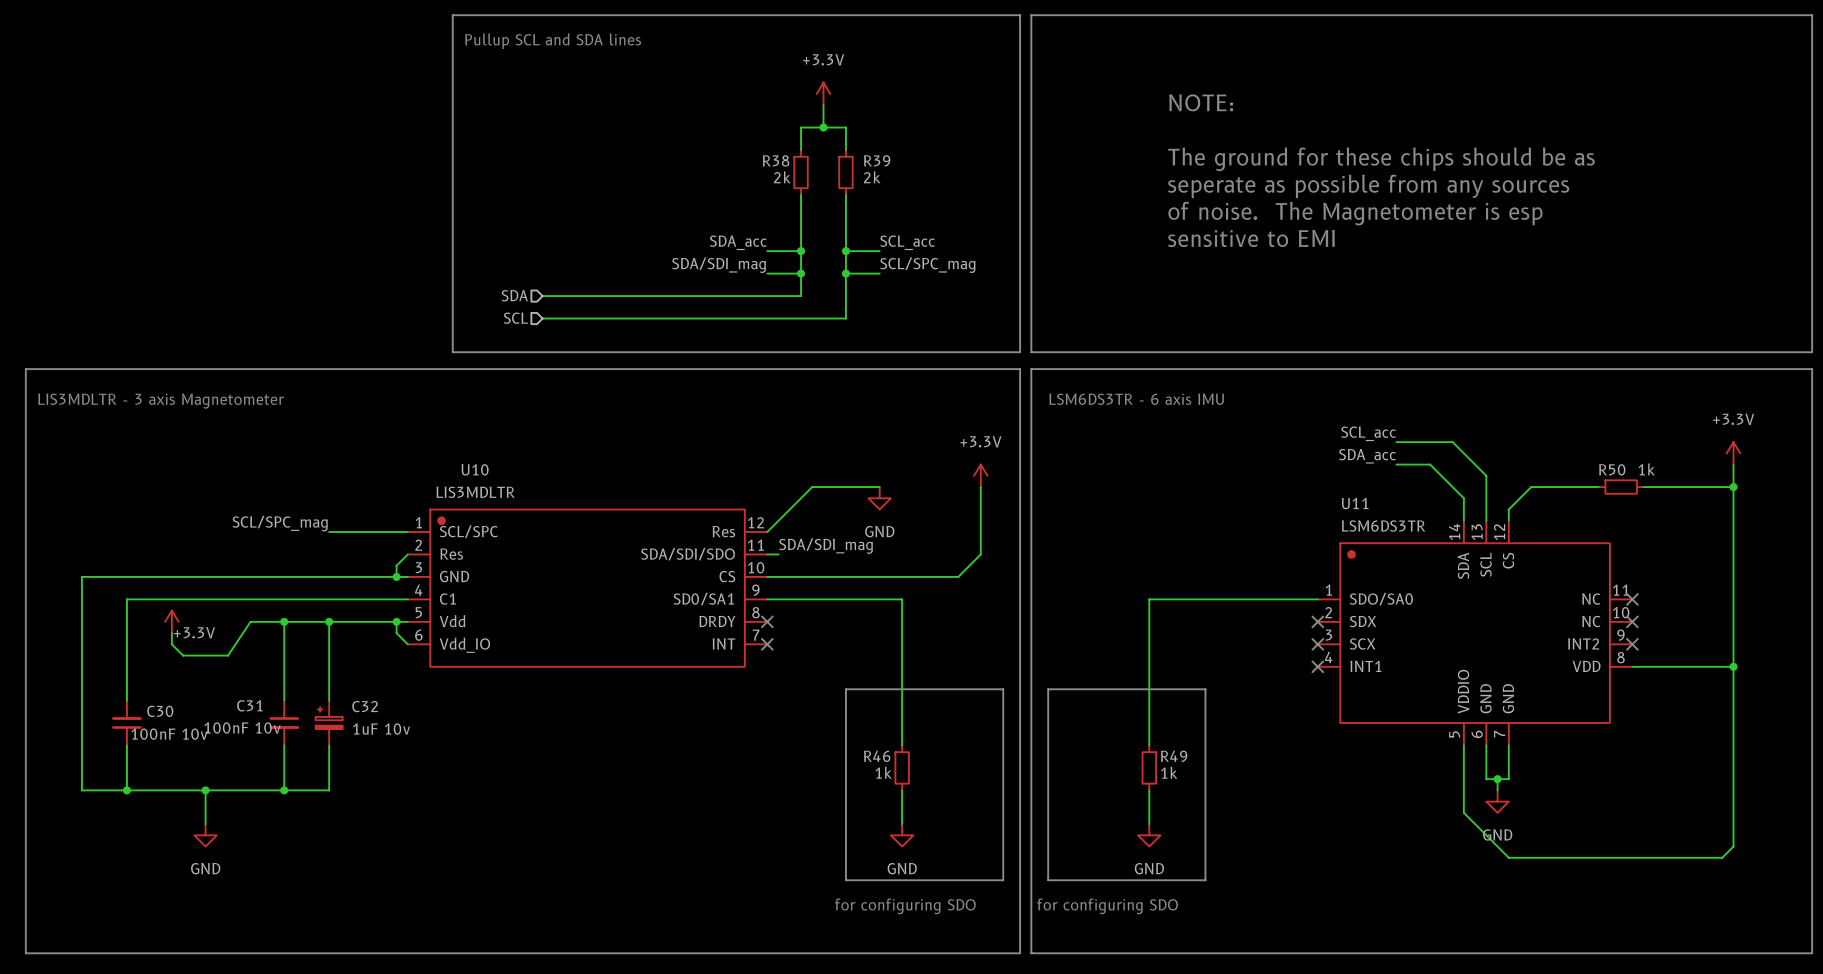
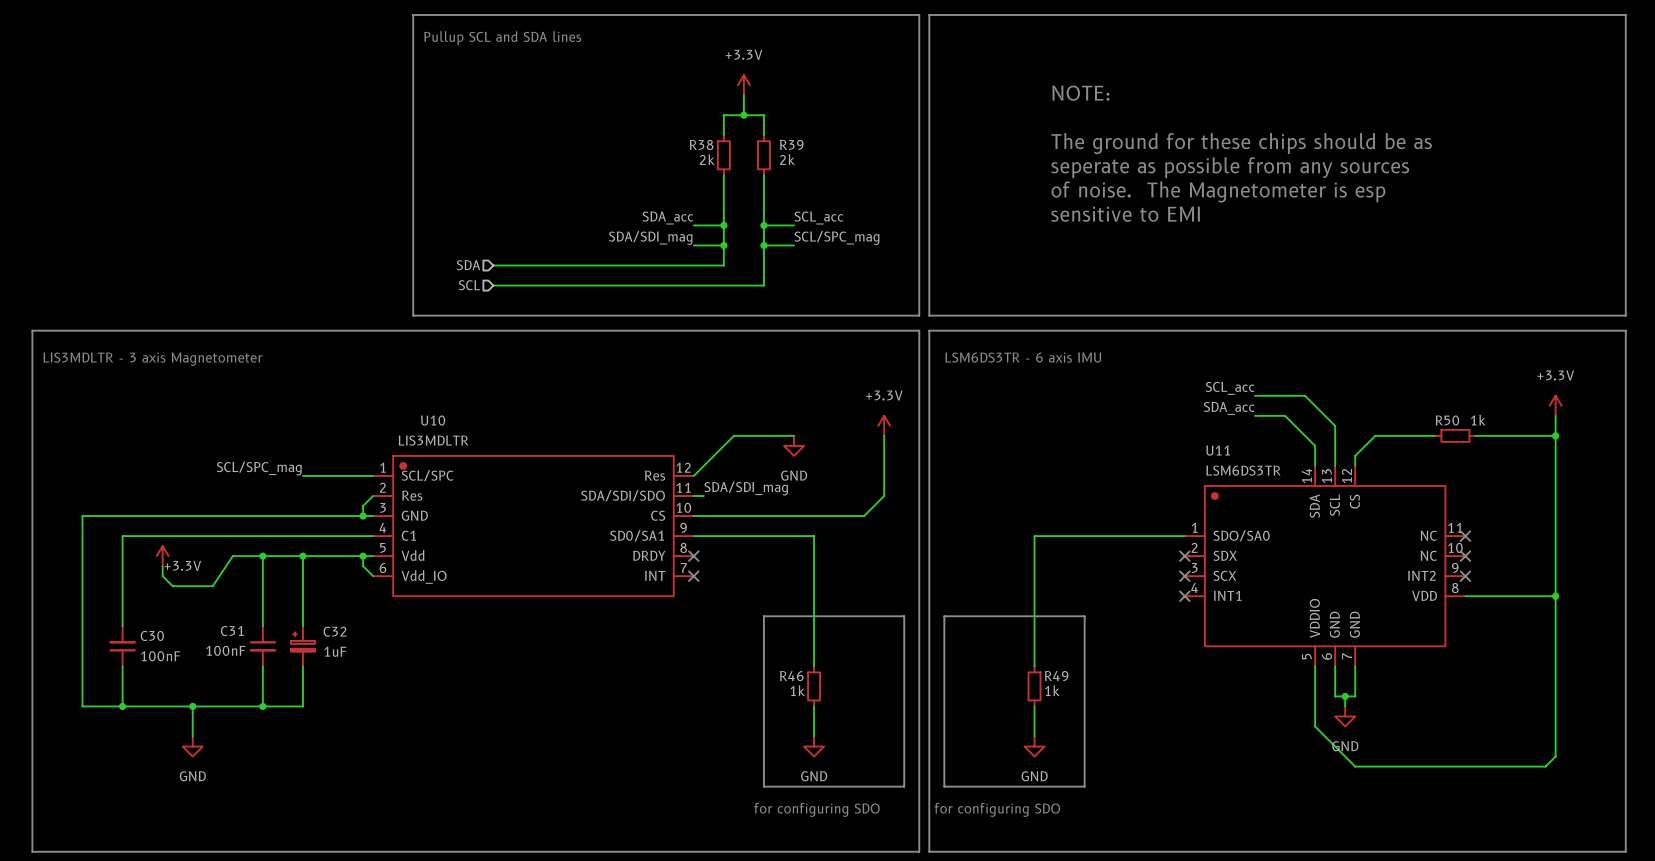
C31 value: 100nF 10v (242, 728) -> 100nF (225, 650)
C32 value: 1uF 10v (381, 729) -> 1uF (335, 651)
C30 value: 100nF 10v (169, 734) -> 100nF (160, 656)

